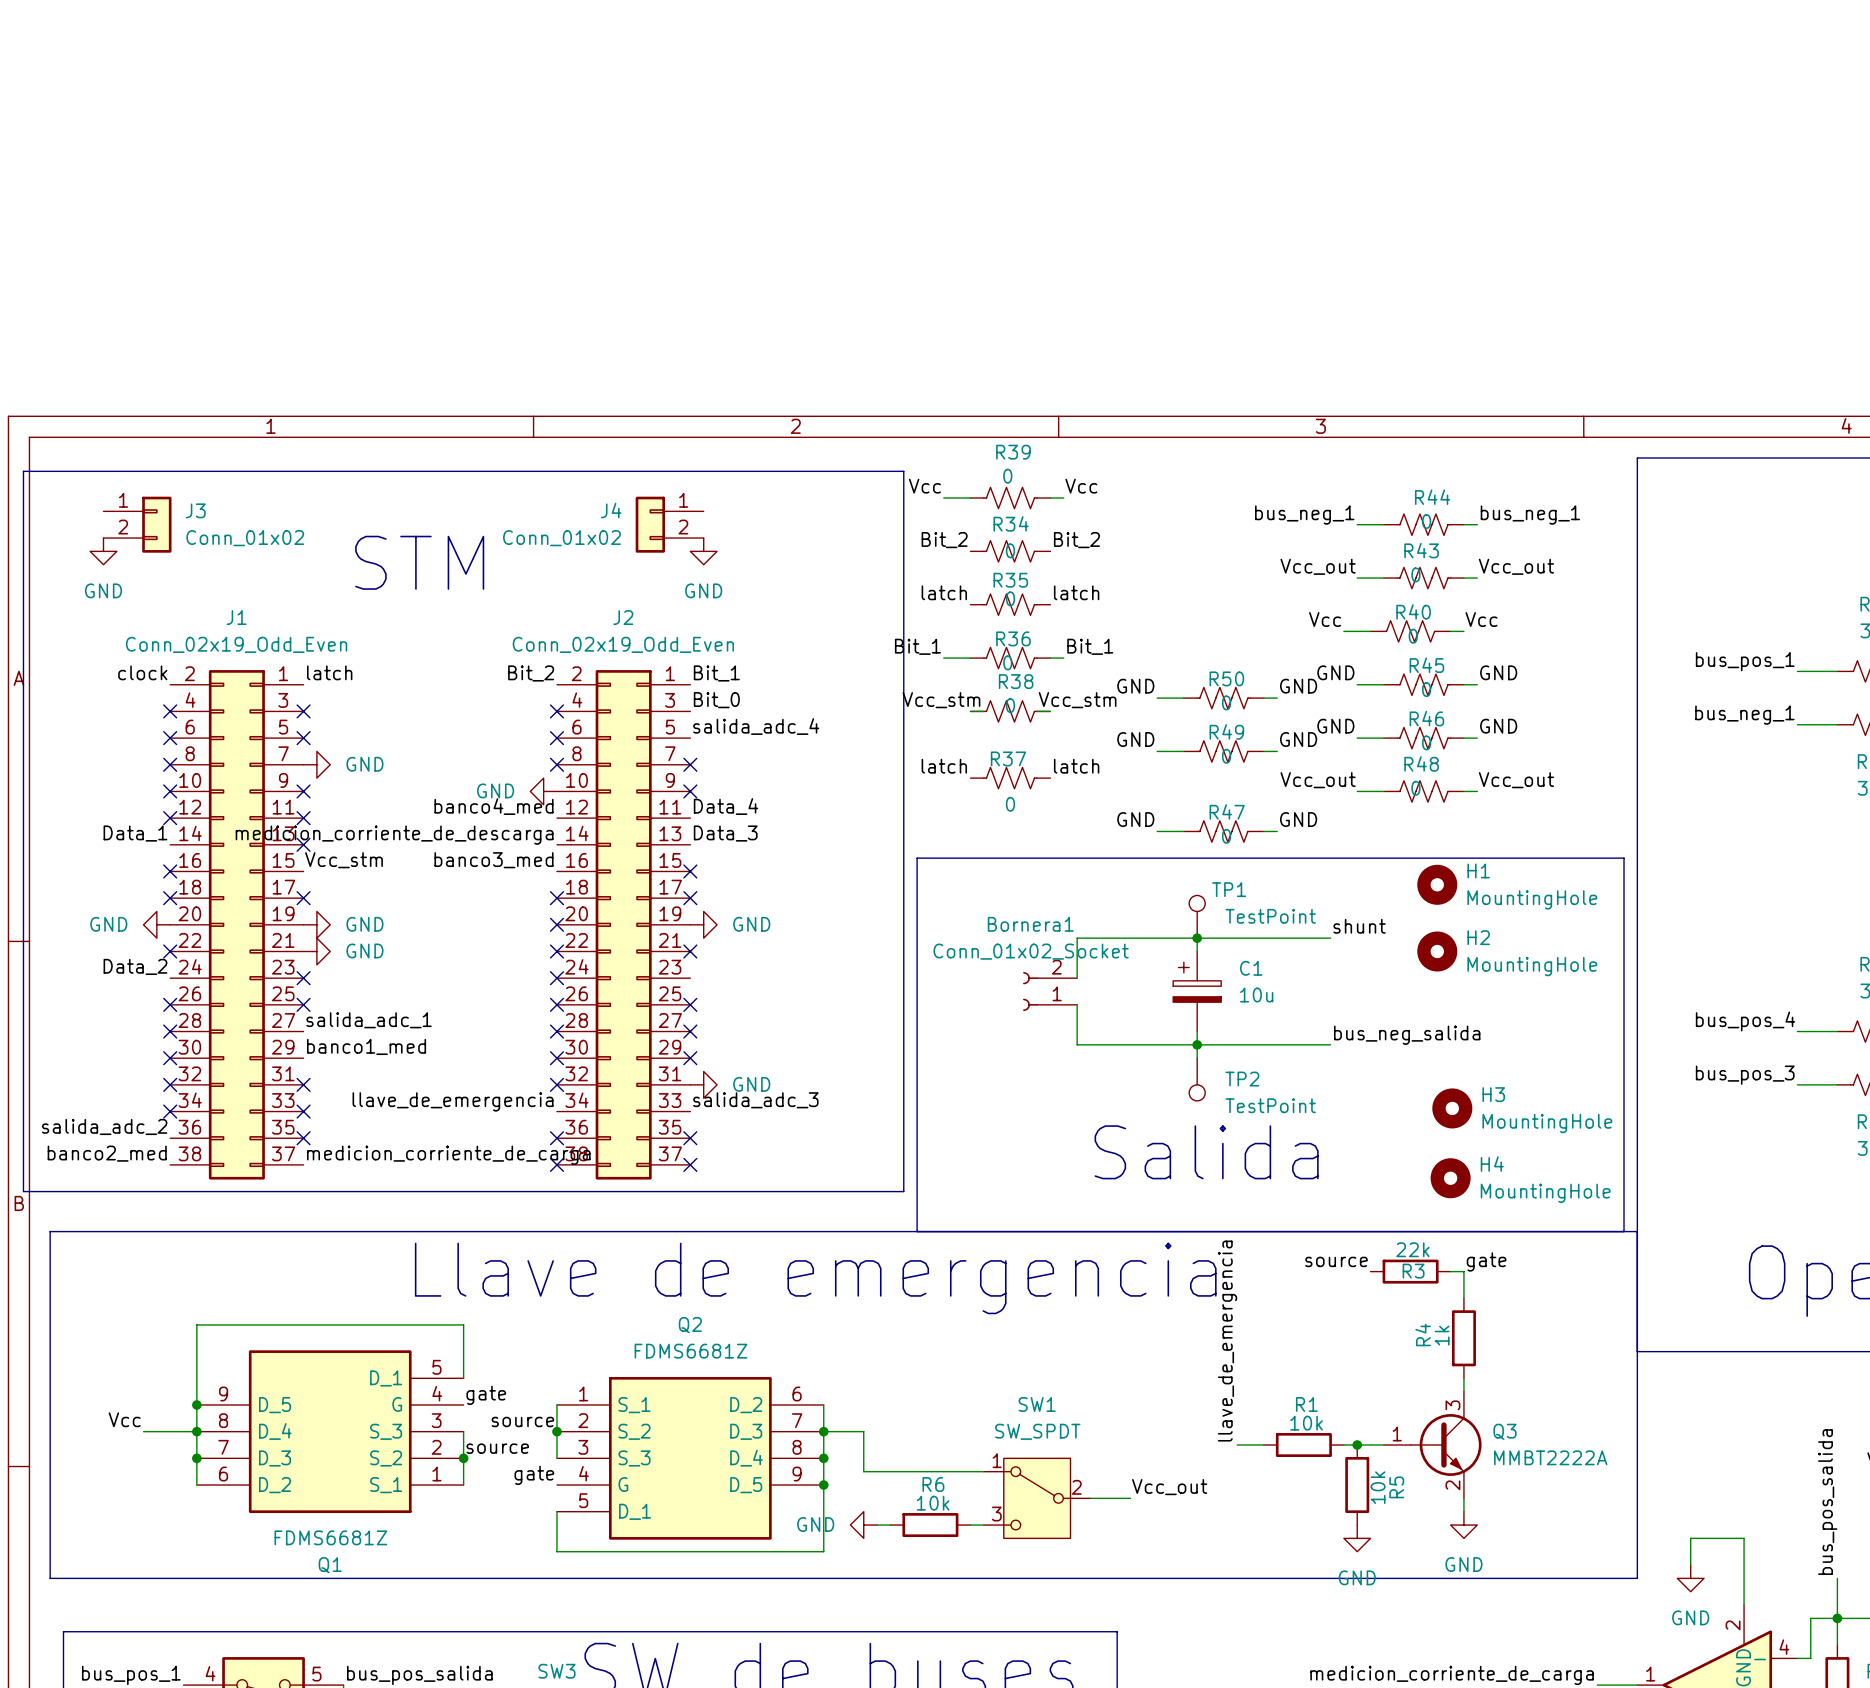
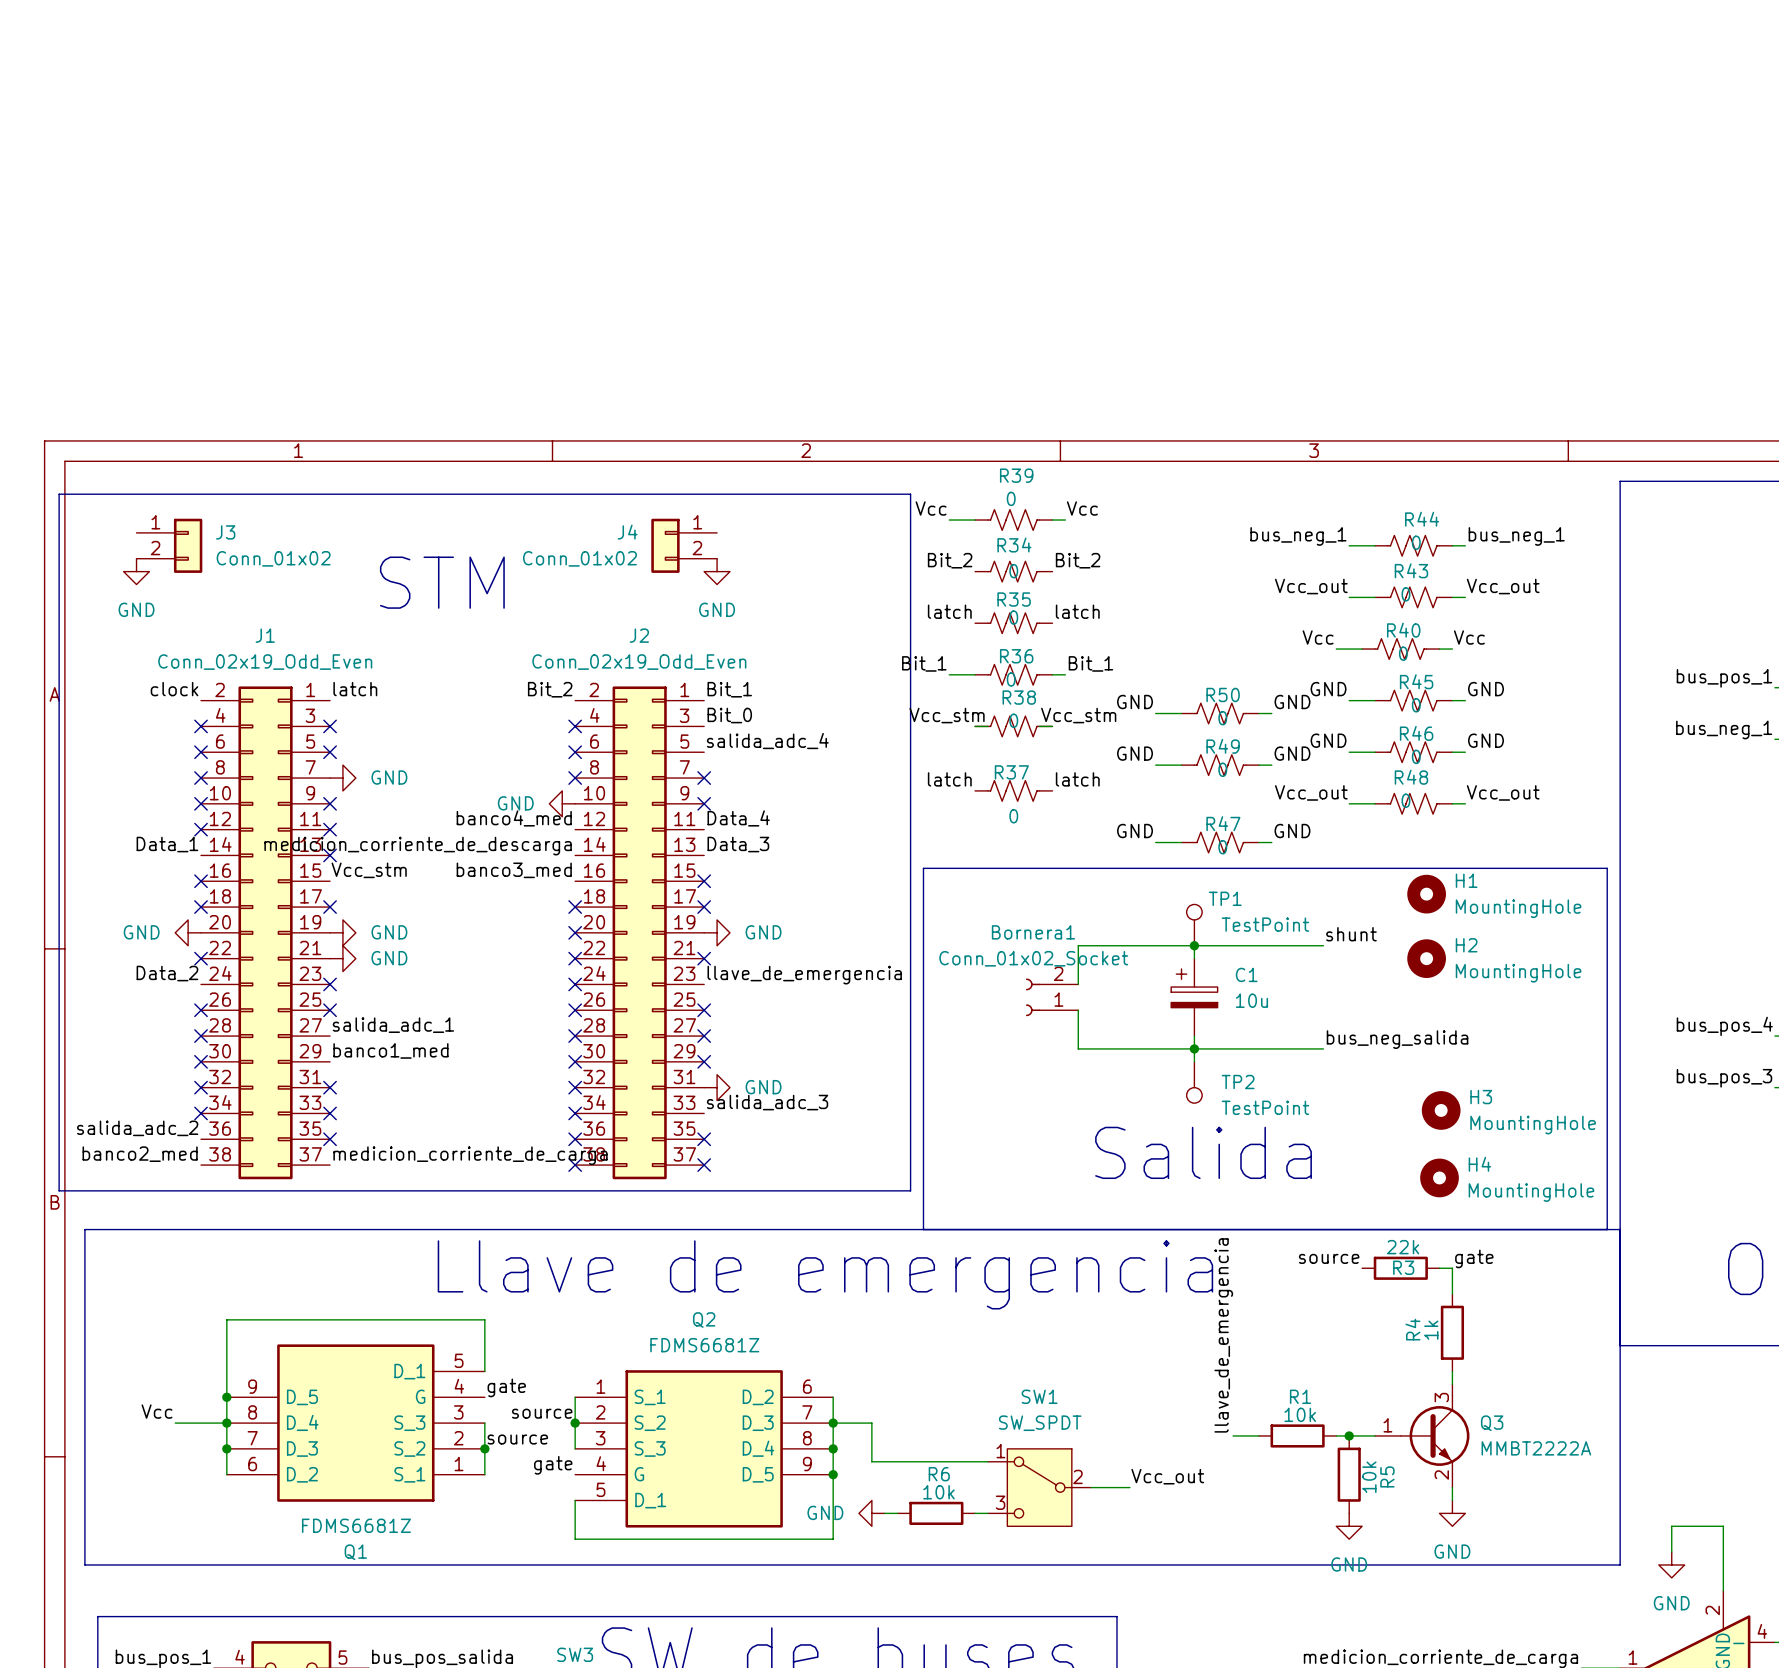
label position: llave_de_emergencia (453, 1101) -> llave_de_emergencia (804, 975)
no-connect mark: none -> (575, 1113)

